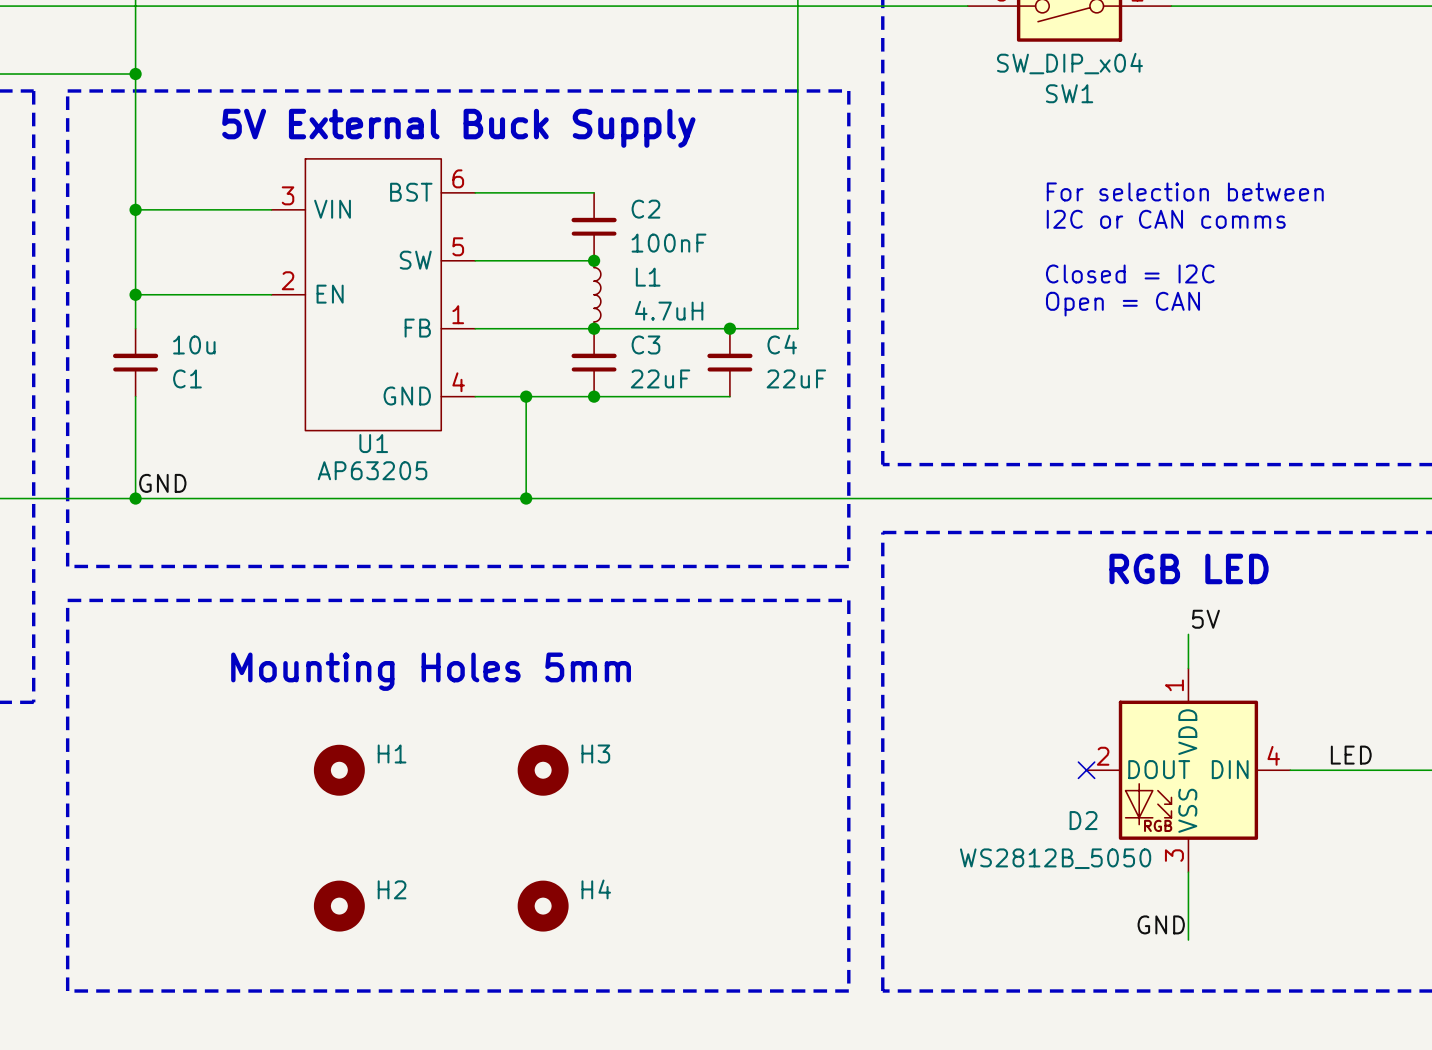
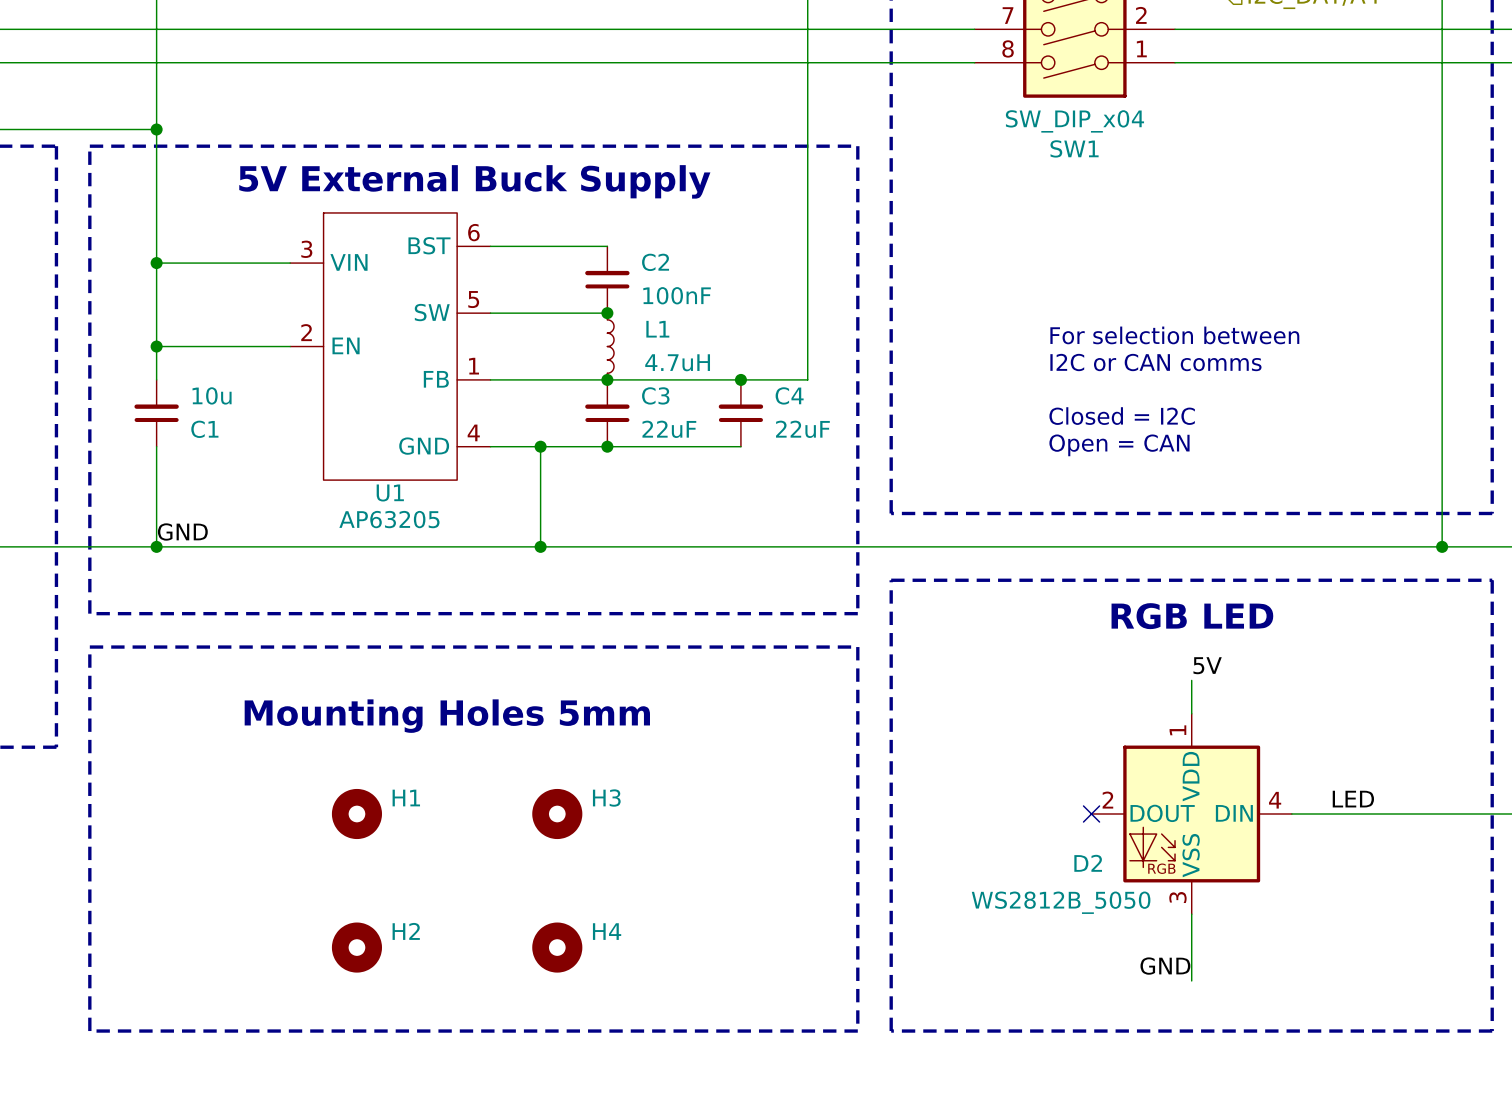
text position: For selection between (1185, 191) -> For selection between (1174, 335)
text position: I2C or CAN comms (1166, 219) -> I2C or CAN comms (1155, 362)
text position: Closed = I2C (1130, 273) -> Closed = I2C (1122, 416)
text position: Open = CAN (1122, 304) -> Open = CAN (1119, 445)

